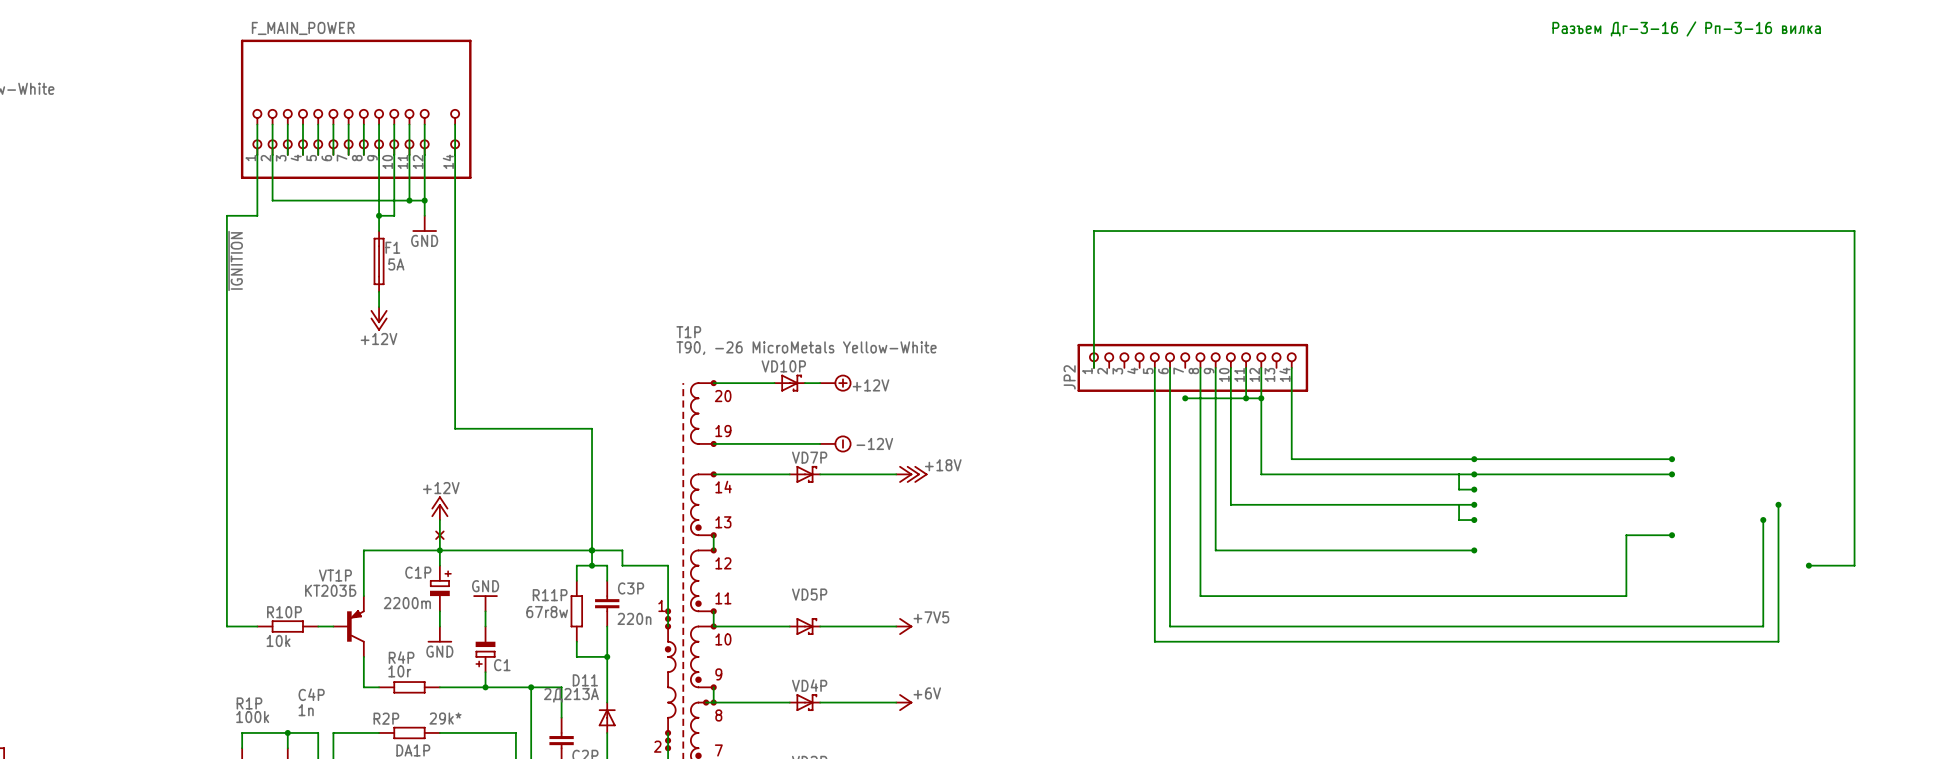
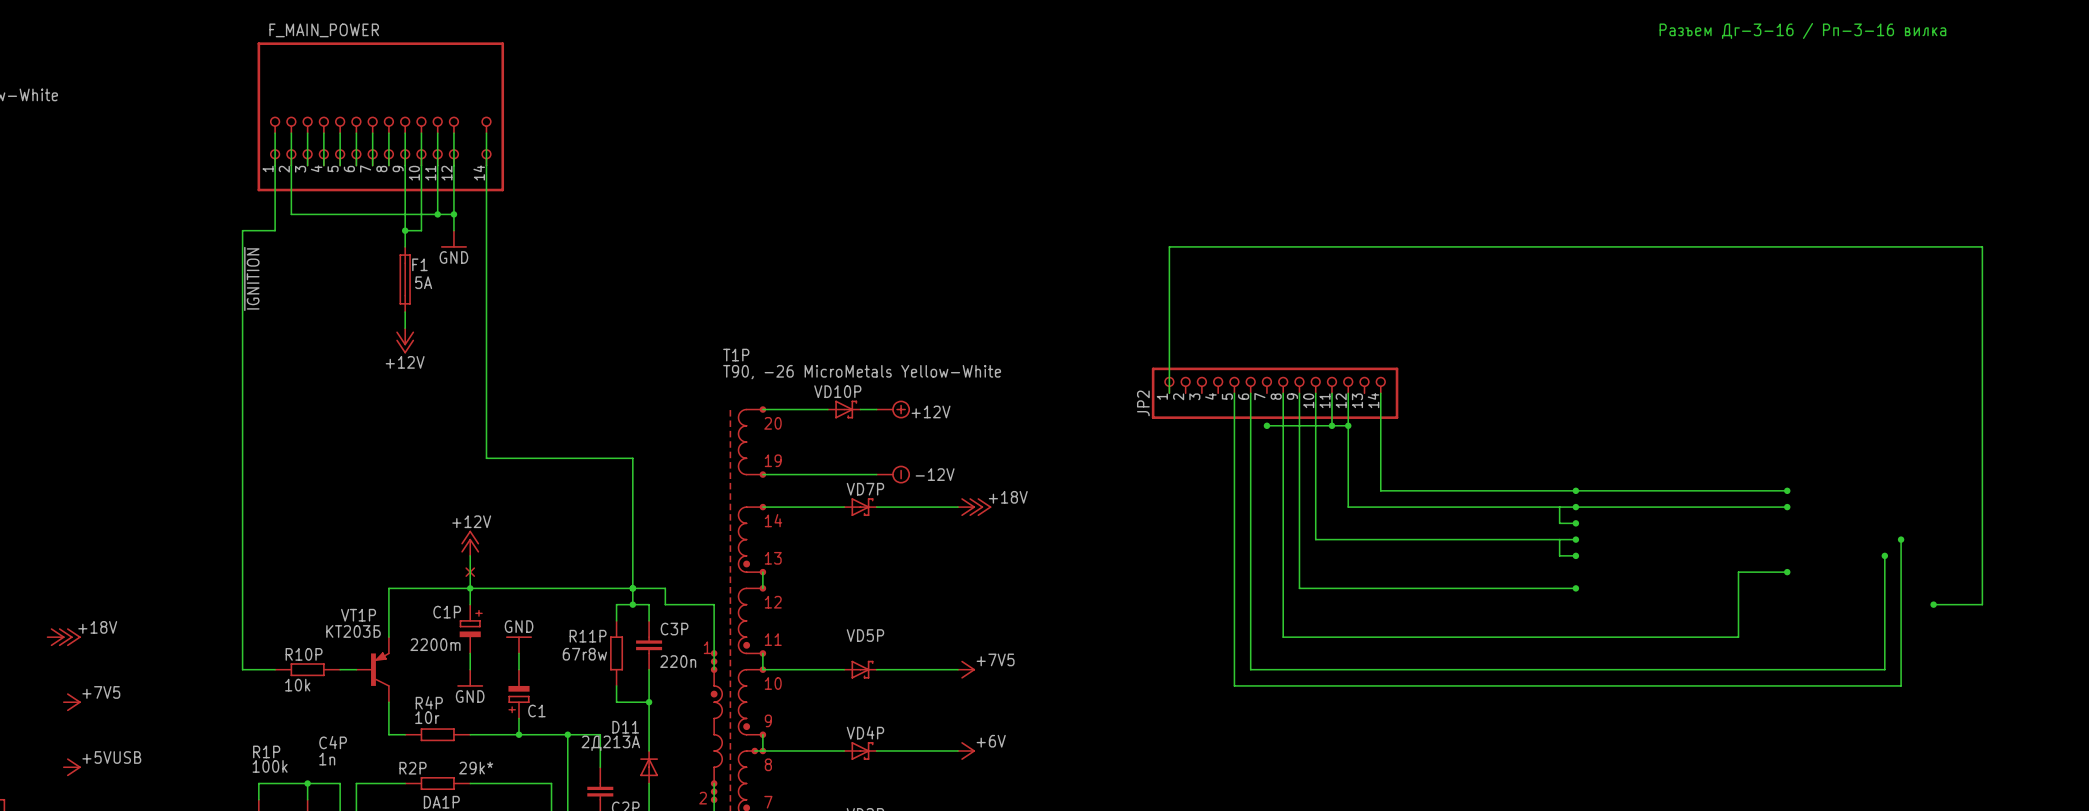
power symbol: none -> +18V (64, 637)
power symbol: none -> +7V5 (72, 702)
power symbol: none -> +5VUSB (72, 767)

